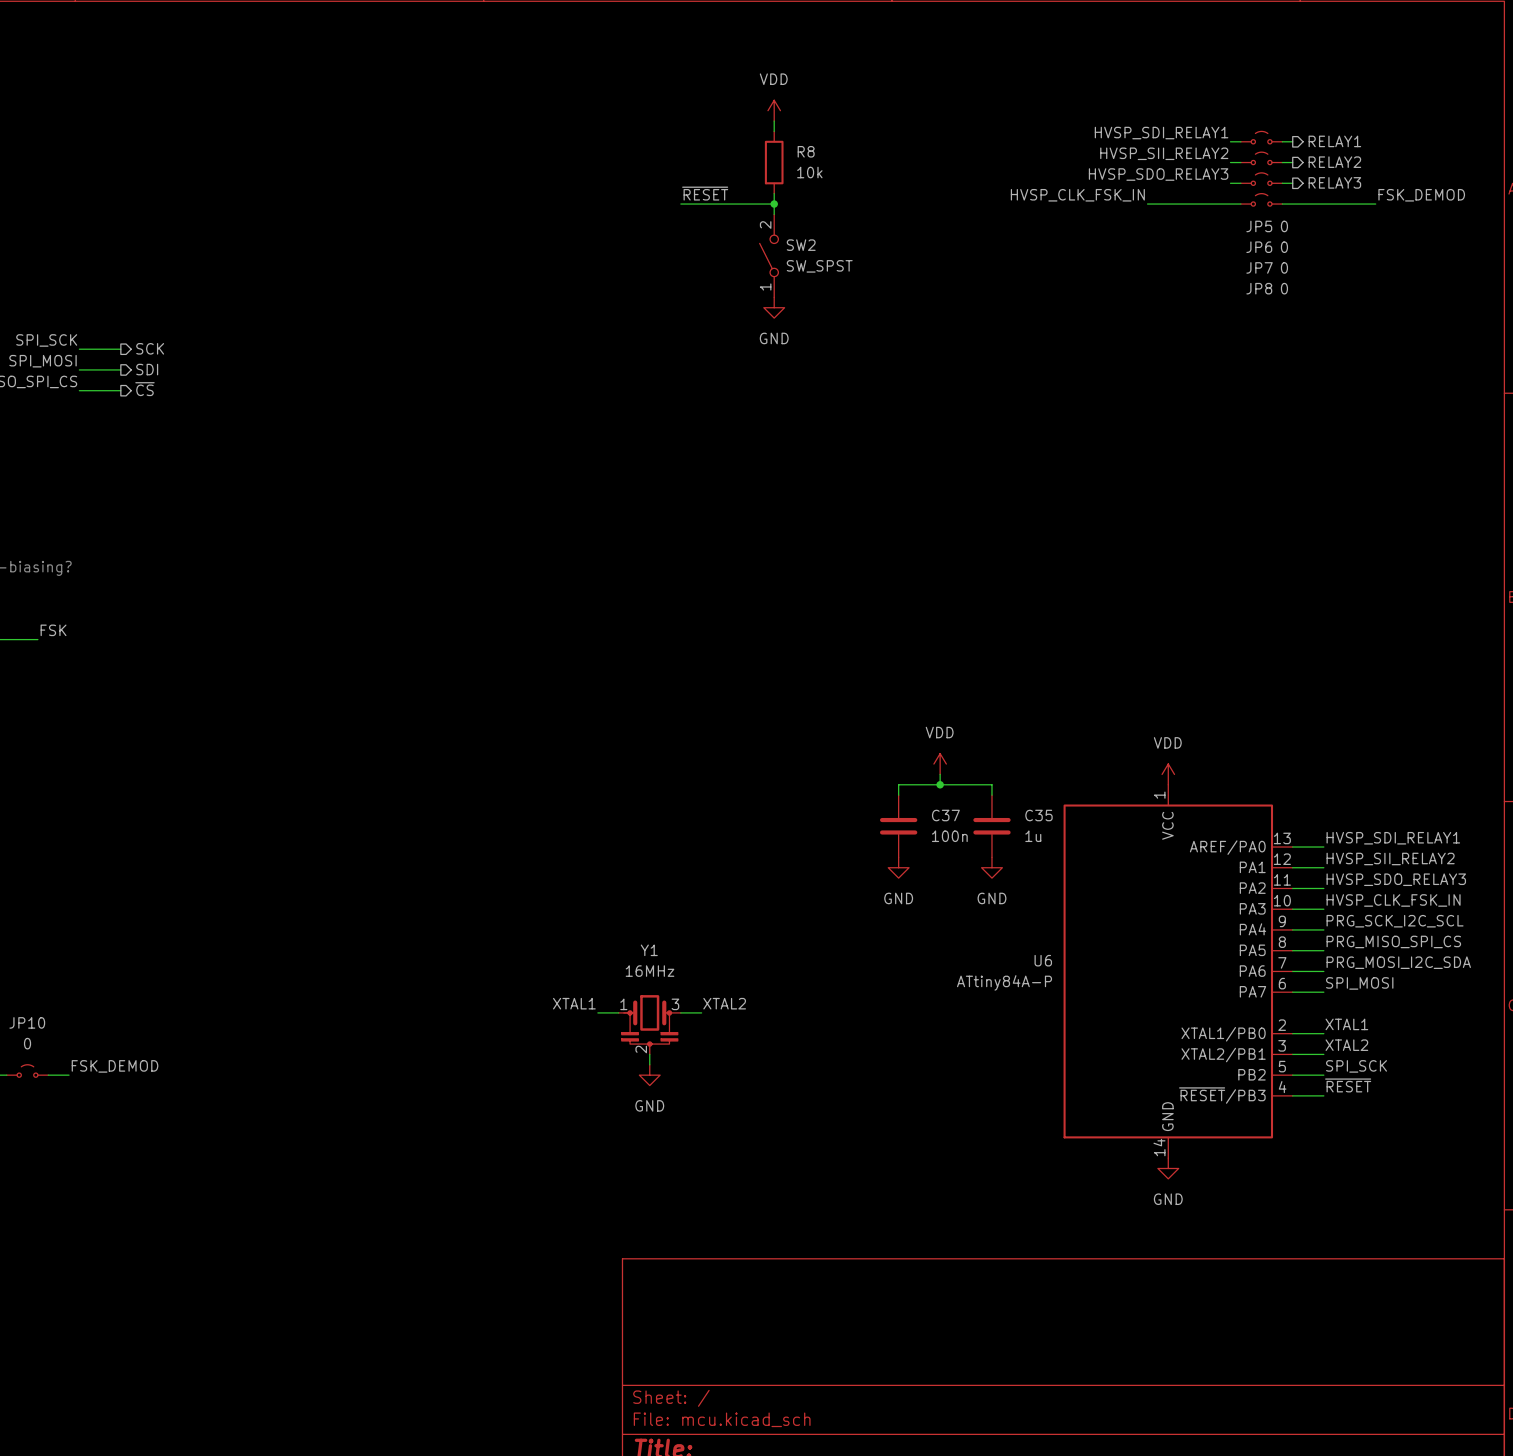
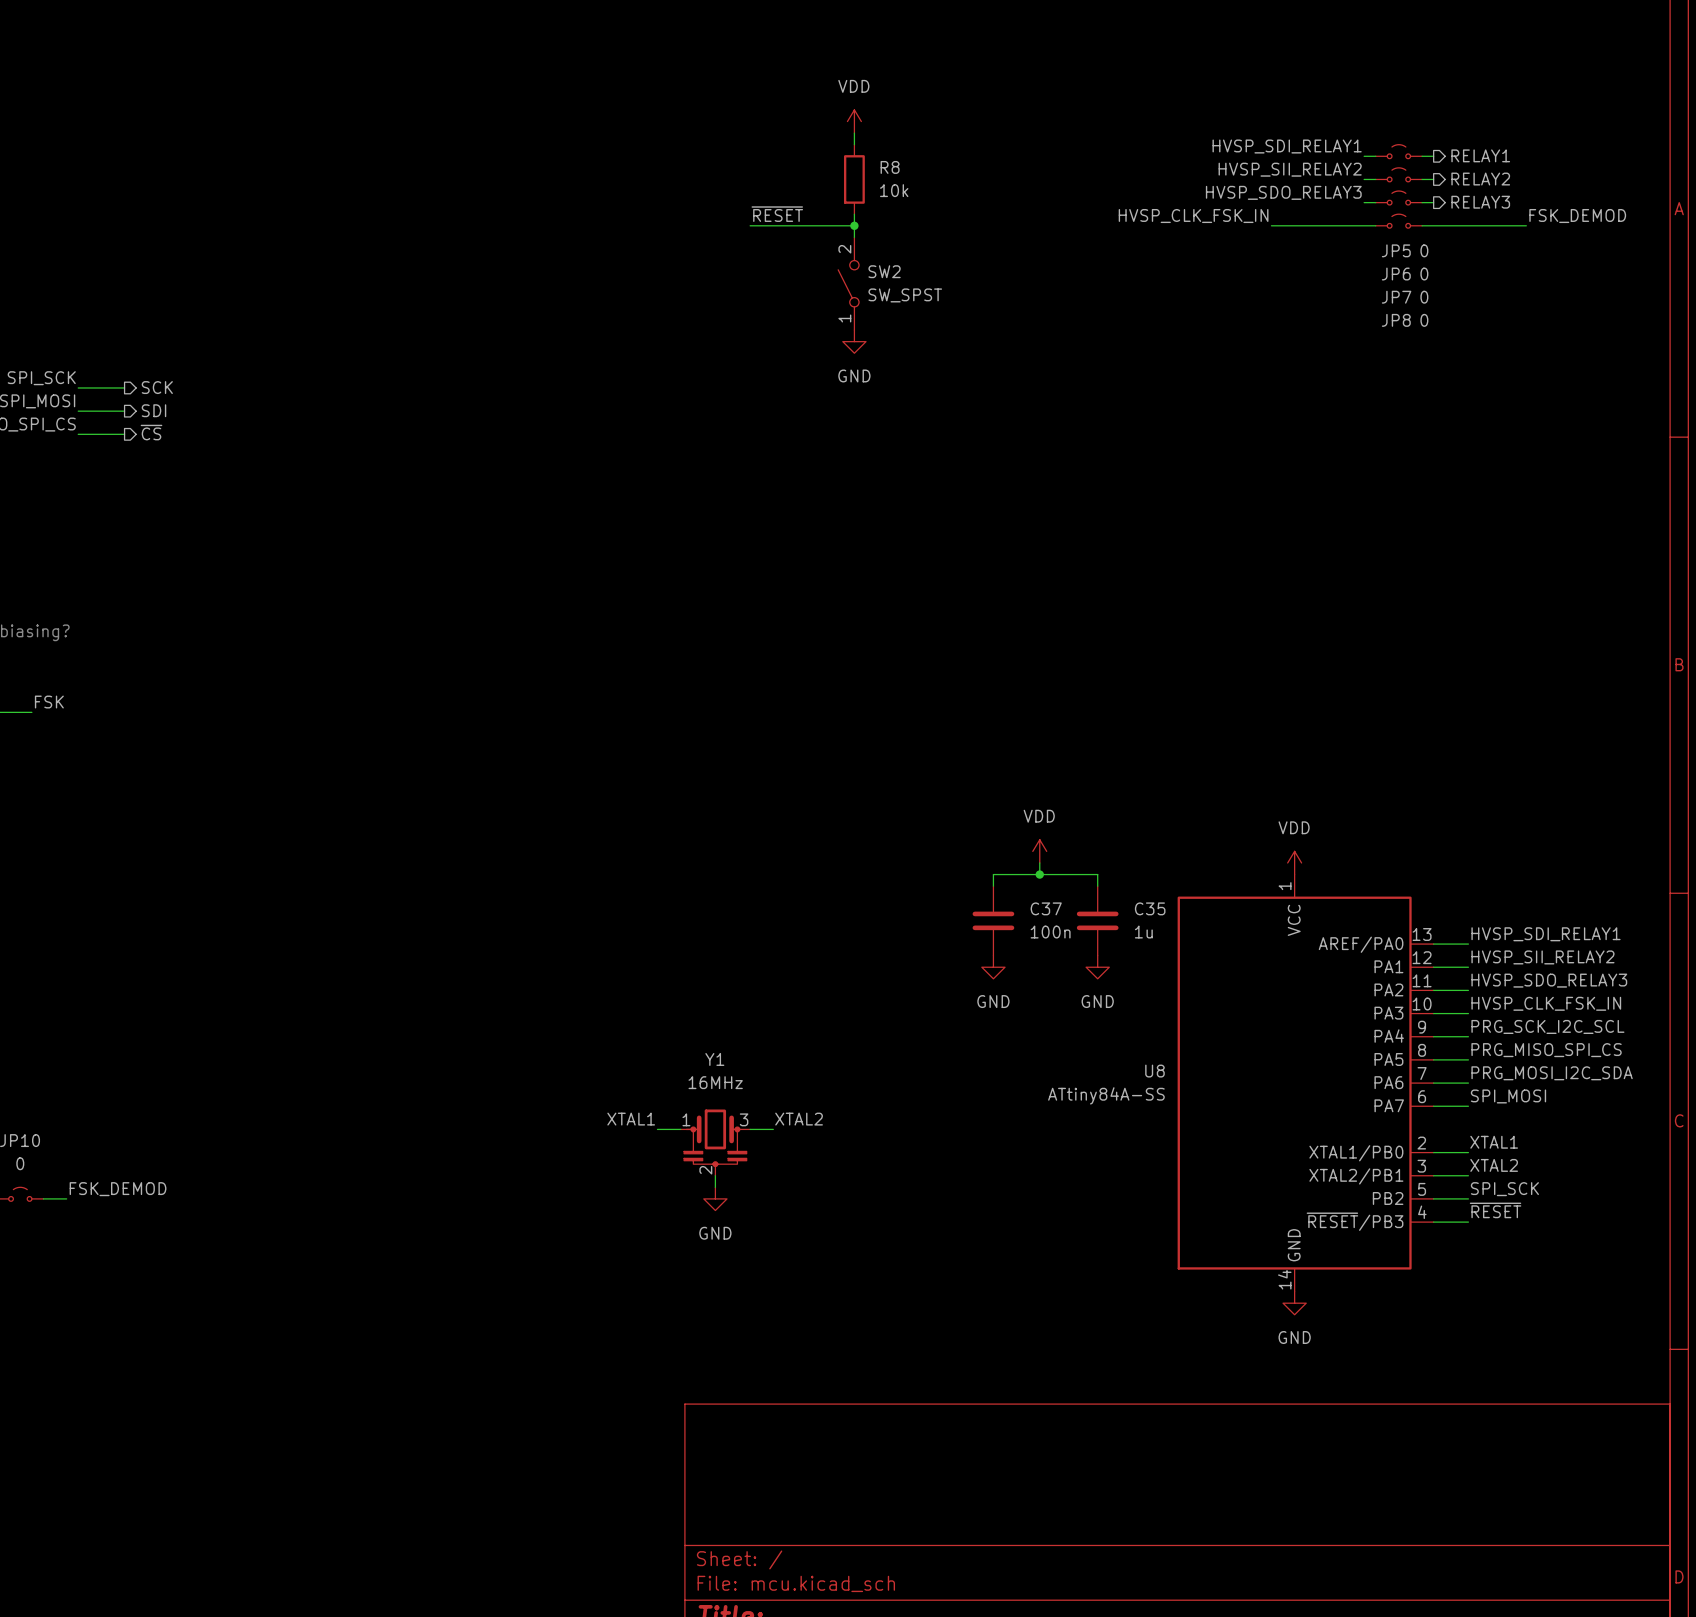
U6 name: U6 (1043, 960) -> U8 (1154, 1071)
U6 value: ATtiny84A-P (1004, 982) -> ATtiny84A-SS (1106, 1095)

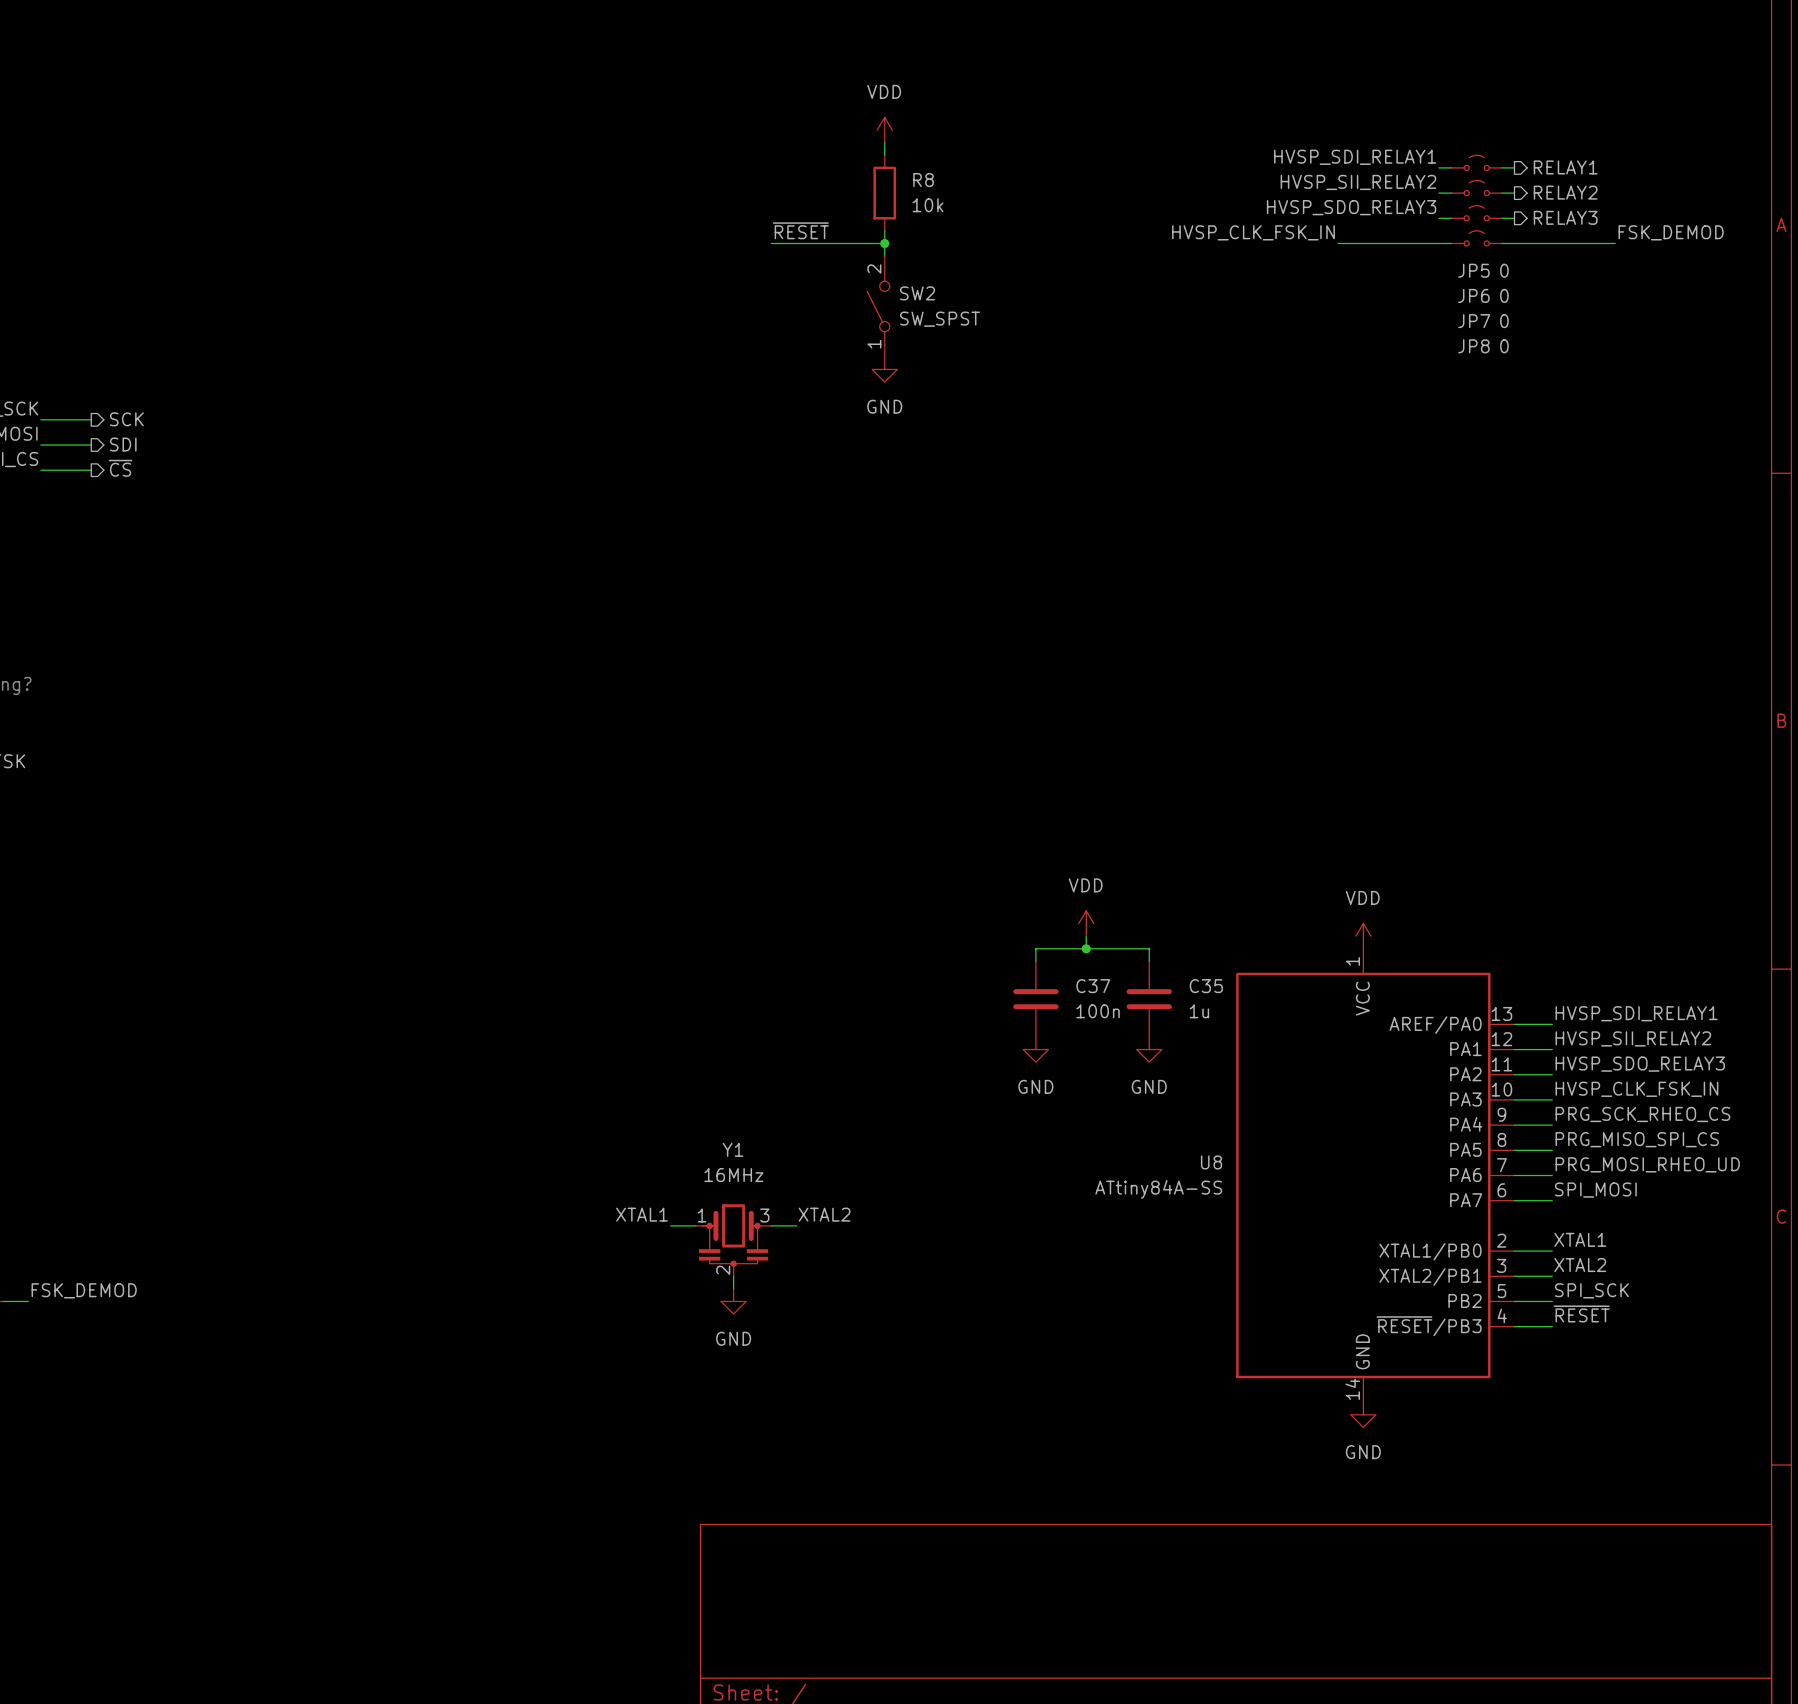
label: PRG_SCK_I2C_SCL (1547, 1026) -> PRG_SCK_RHEO_CS (1642, 1114)
label: PRG_MOSI_I2C_SDA (1552, 1073) -> PRG_MOSI_RHEO_UD (1647, 1164)

